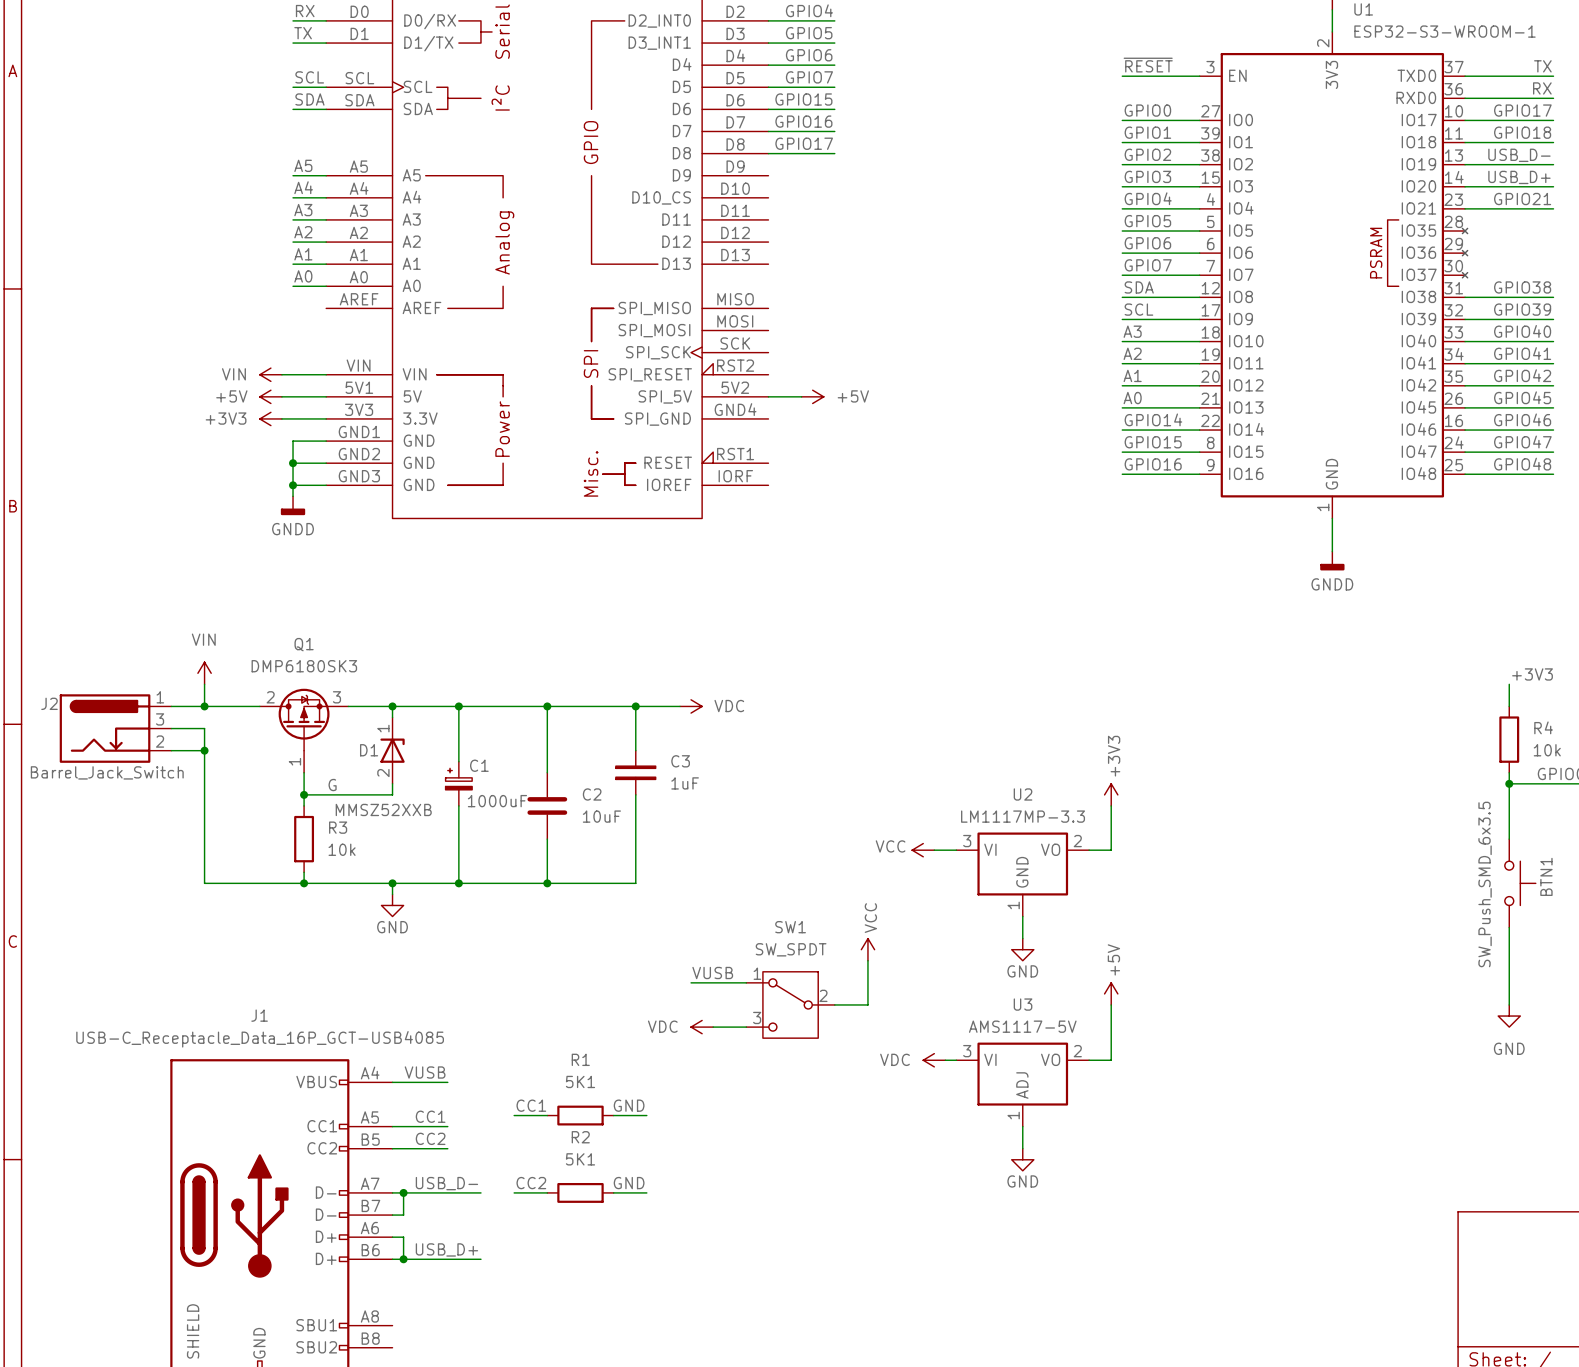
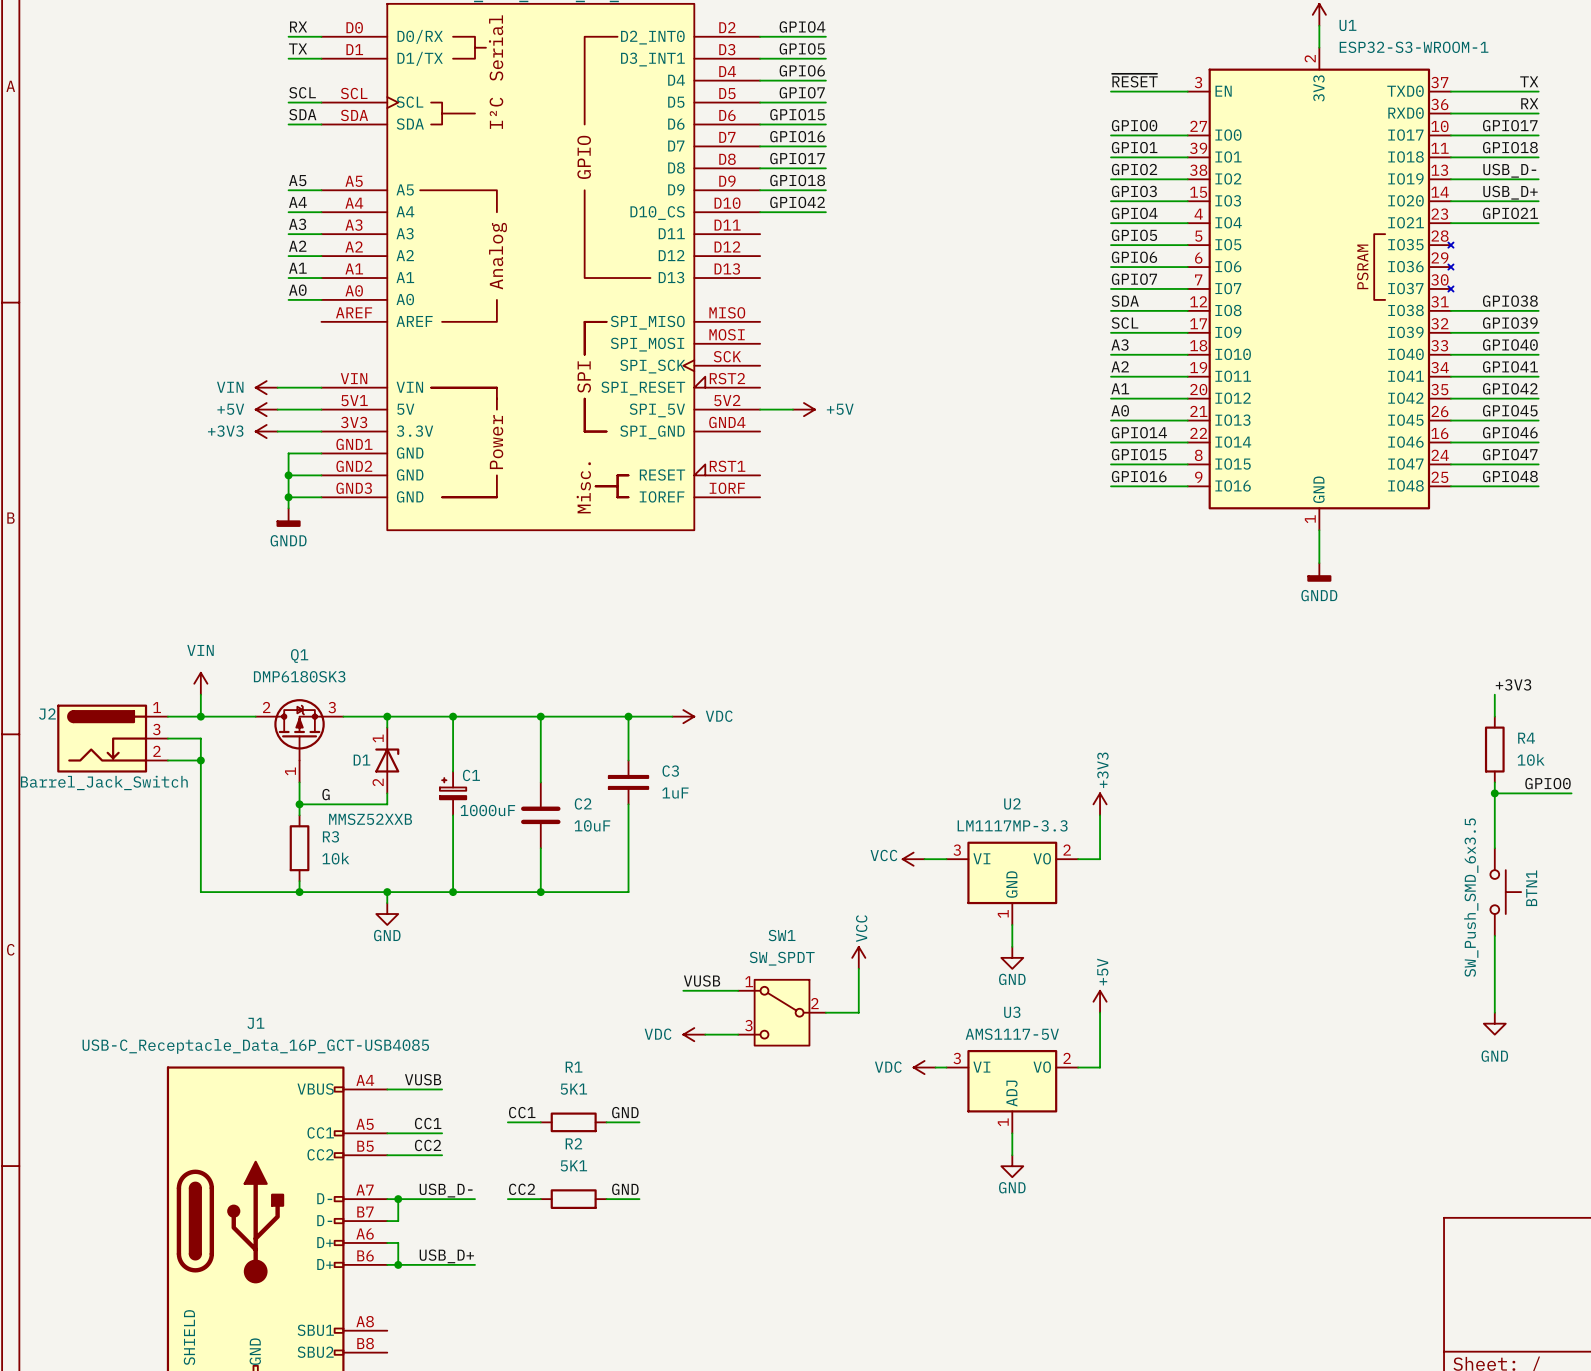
label: none -> GPIO18 (797, 180)
wire: none -> (760, 190) (825, 190)
label: none -> GPIO42 (797, 202)
wire: none -> (760, 212) (825, 212)

